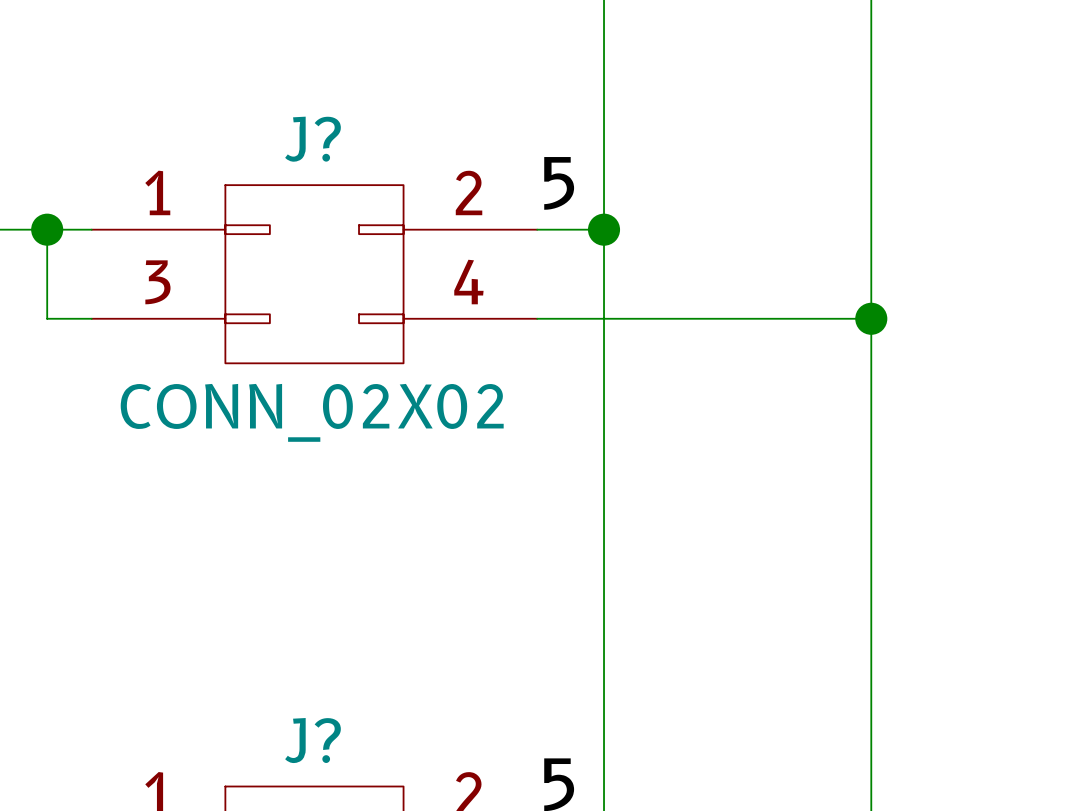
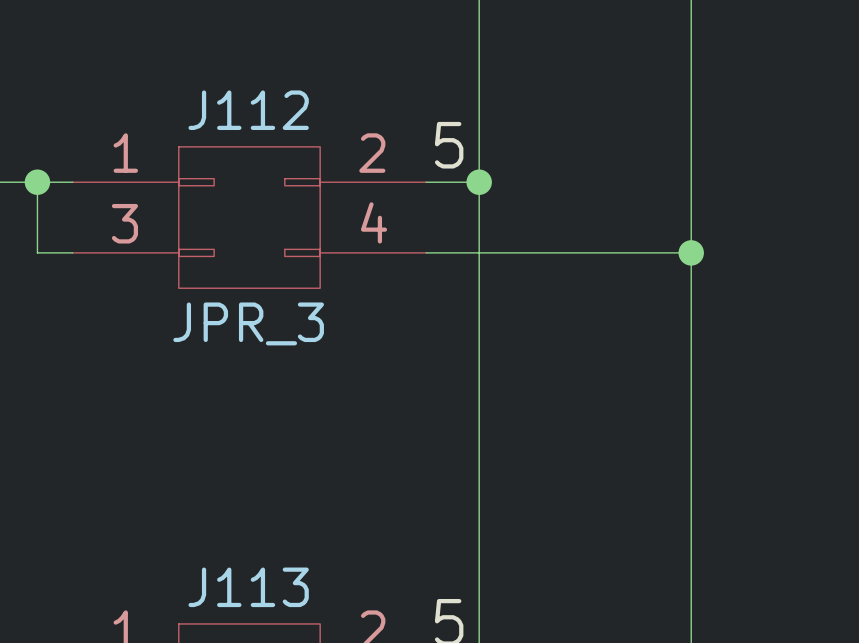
J? name: J? (313, 139) -> J112 (248, 110)
J? value: CONN_02X02 (312, 412) -> JPR_3 (248, 323)
J? name: J? (313, 740) -> J113 (248, 587)

